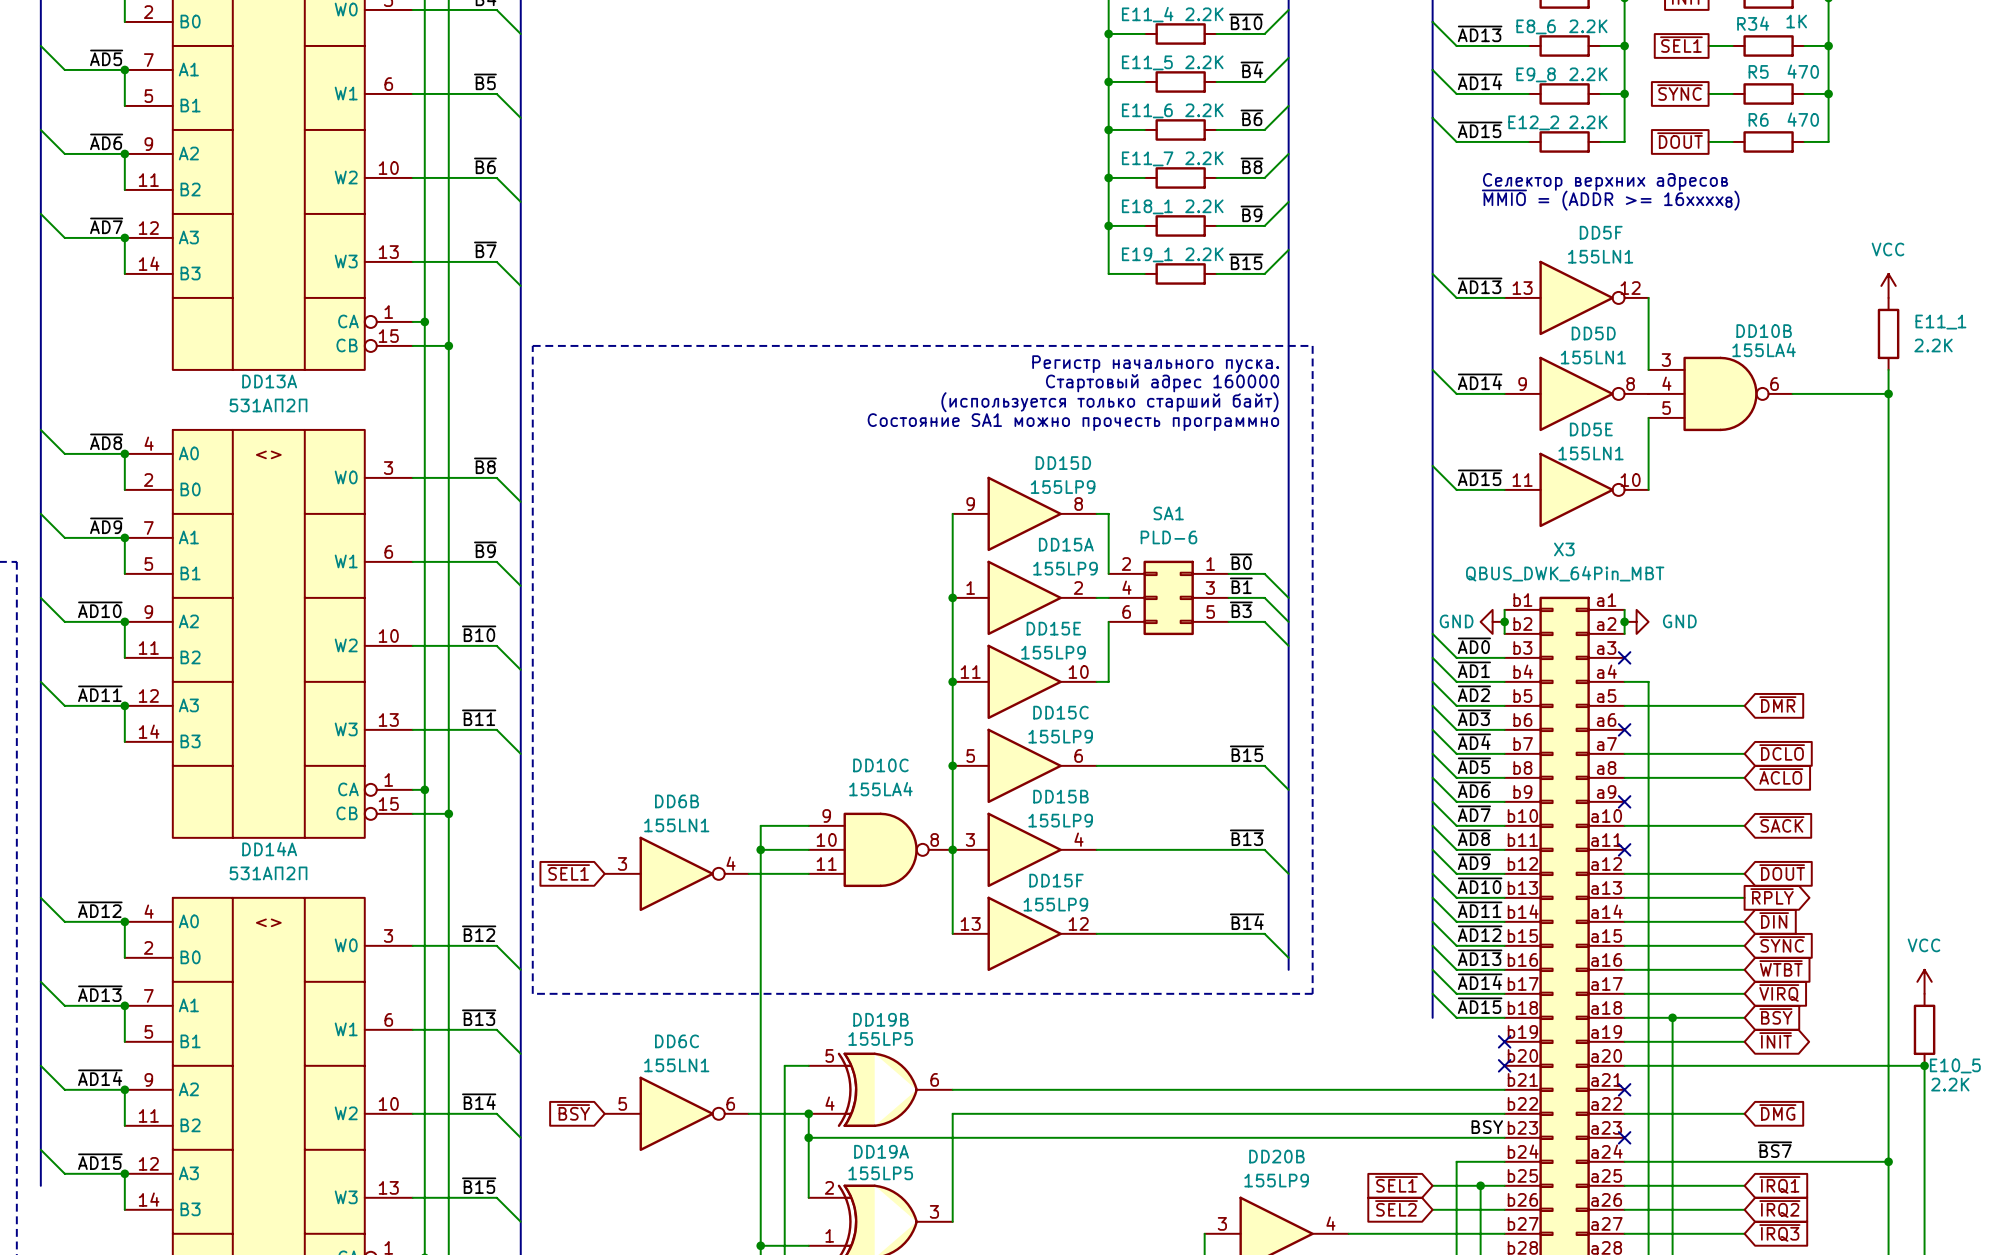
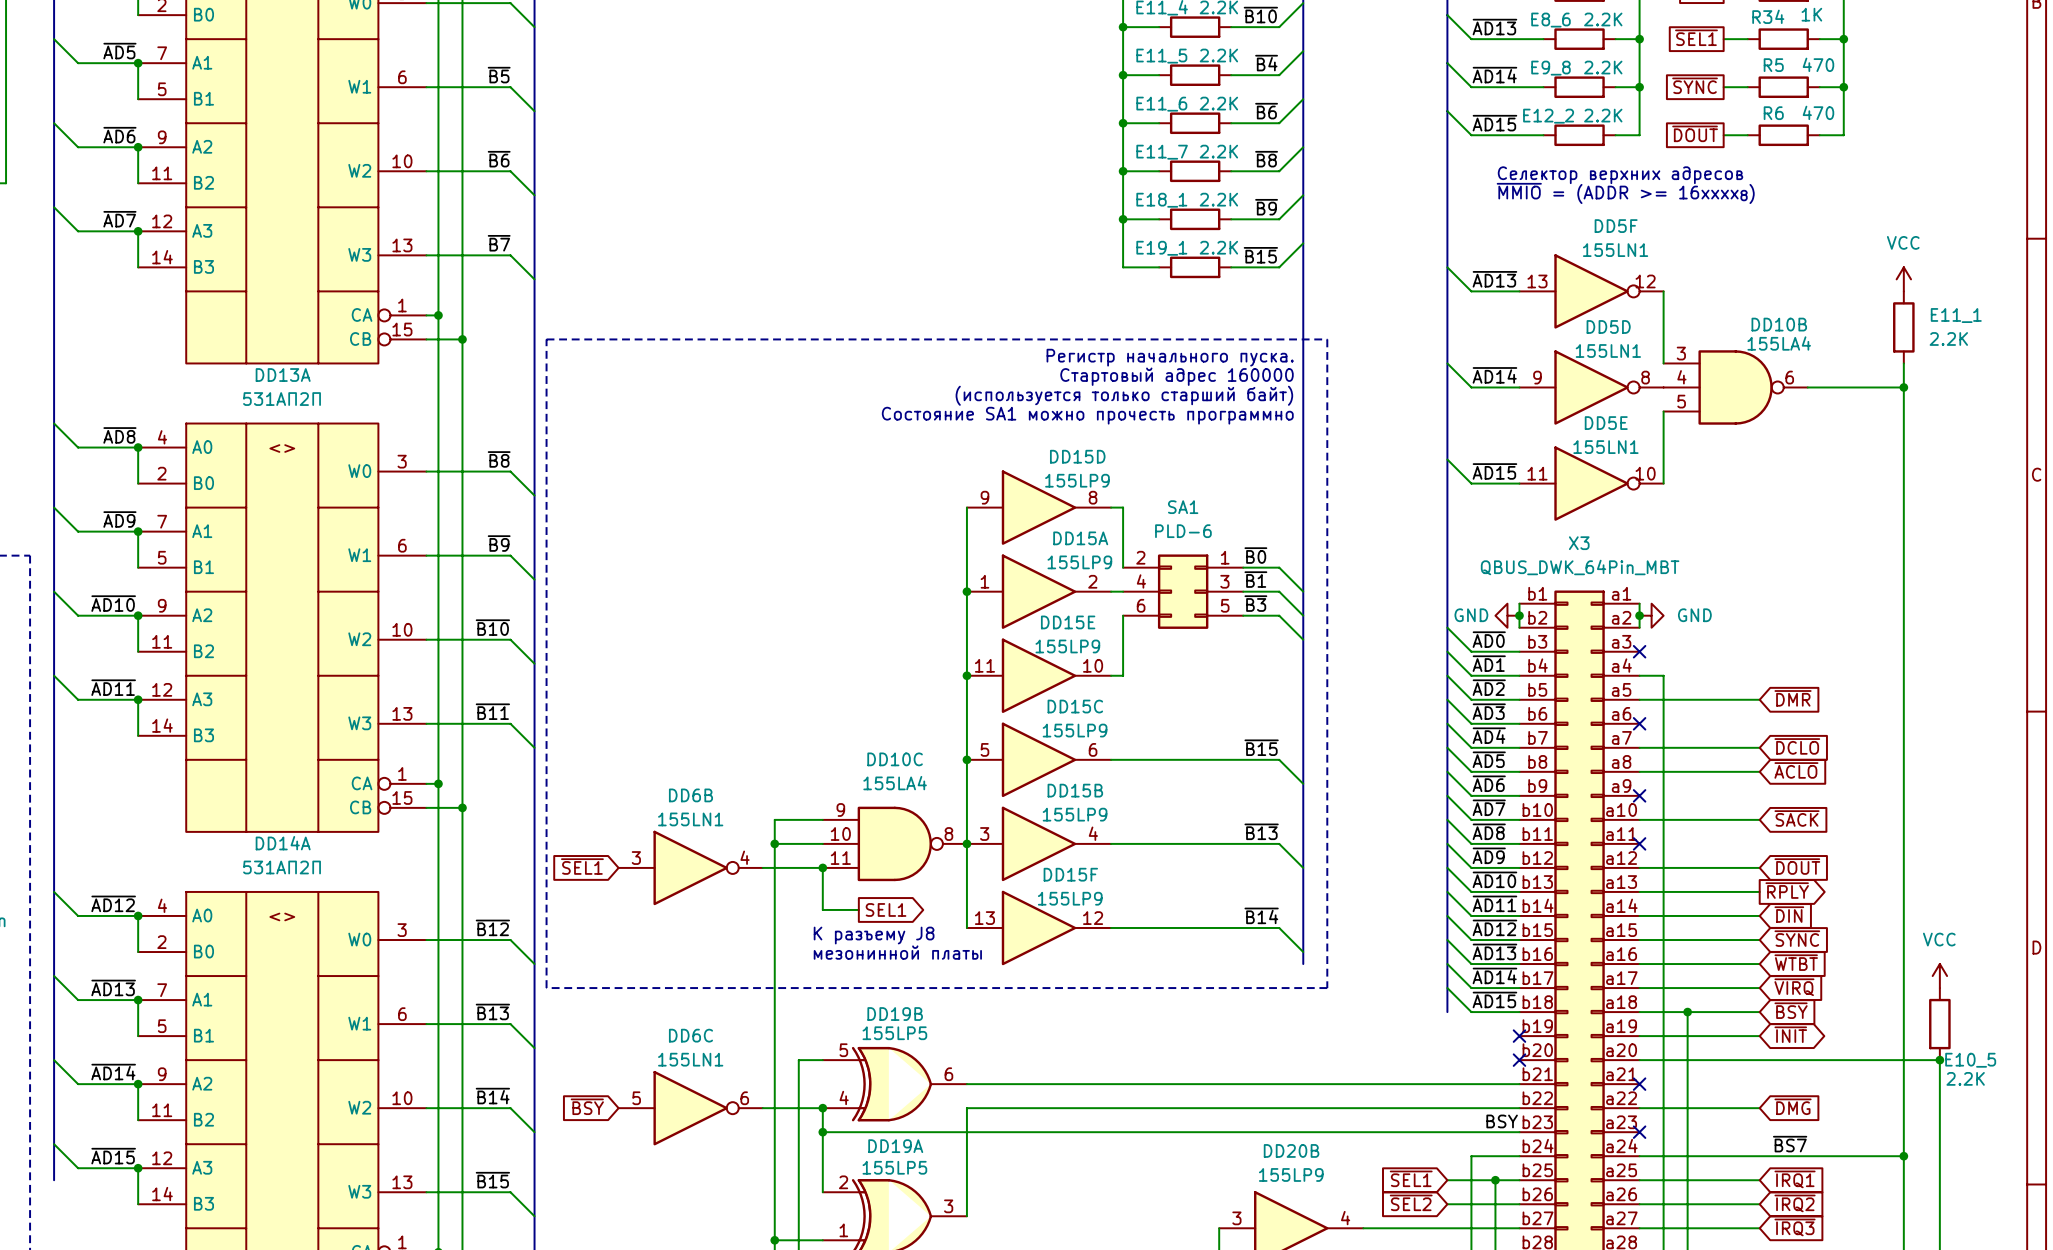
wire: none -> (822, 867) (822, 909) (858, 909)
junction: none -> (822, 867)
global label: none -> SEL1 (886, 909)
text: none -> К разъему J8 (874, 935)
text: none -> мезонинной платы (897, 952)

